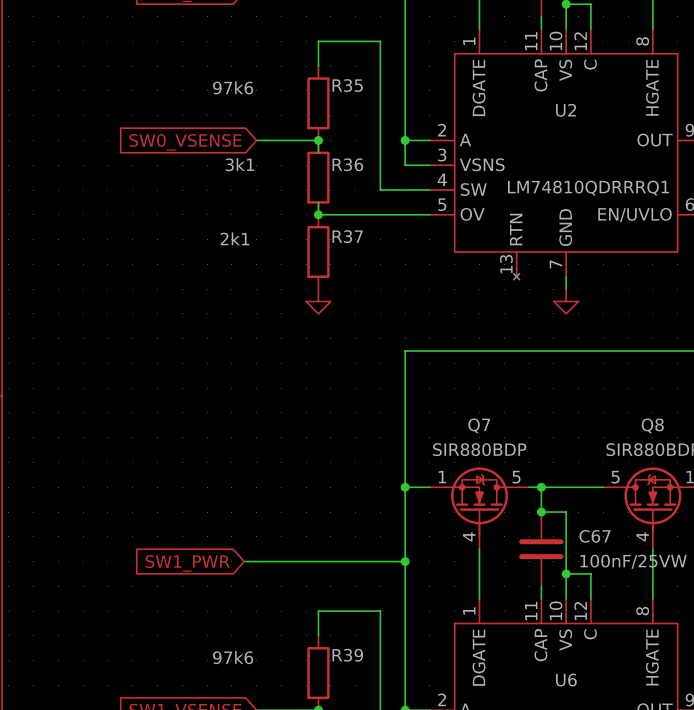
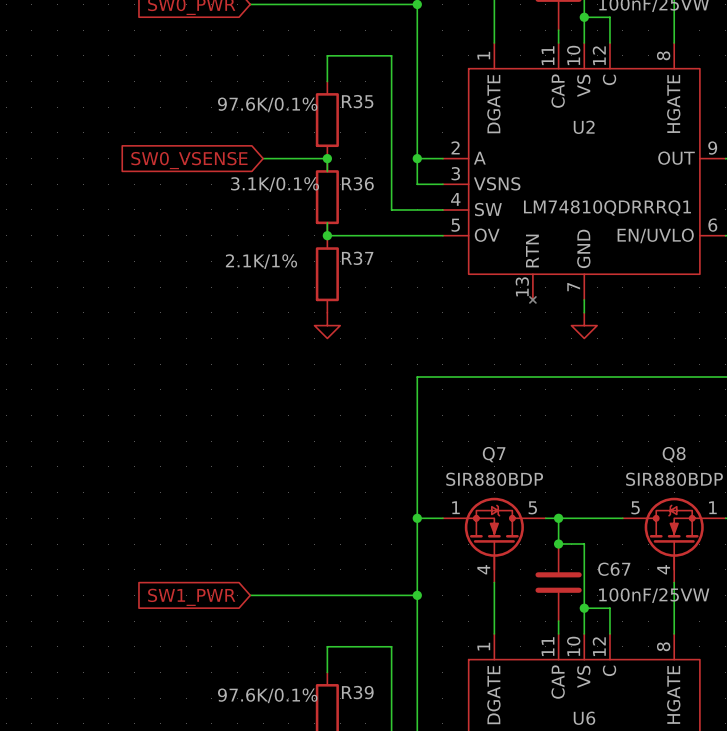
R35 value: 97k6 (233, 87) -> 97.6K/0.1% (267, 104)
R36 value: 3k1 (239, 164) -> 3.1K/0.1% (275, 184)
R37 value: 2k1 (234, 238) -> 2.1K/1% (261, 261)
R39 value: 97k6 (233, 657) -> 97.6K/0.1% (267, 695)

